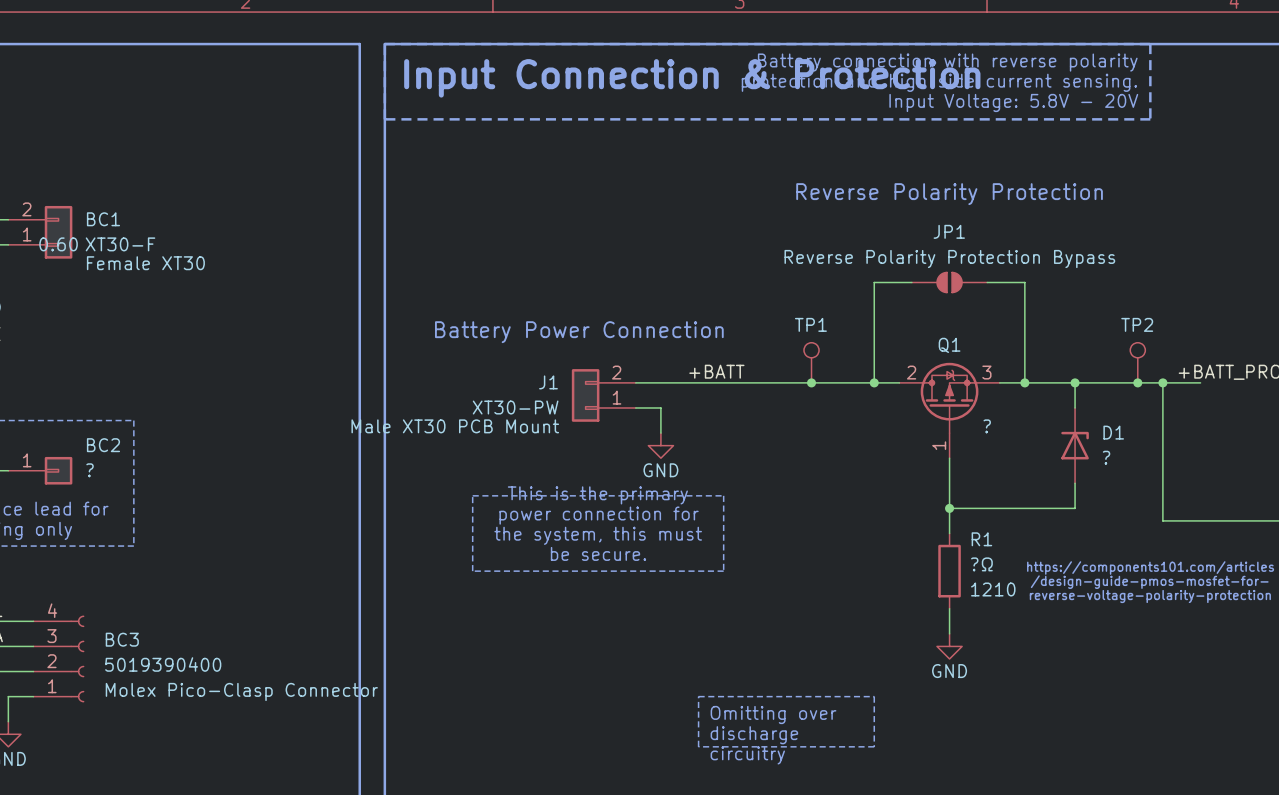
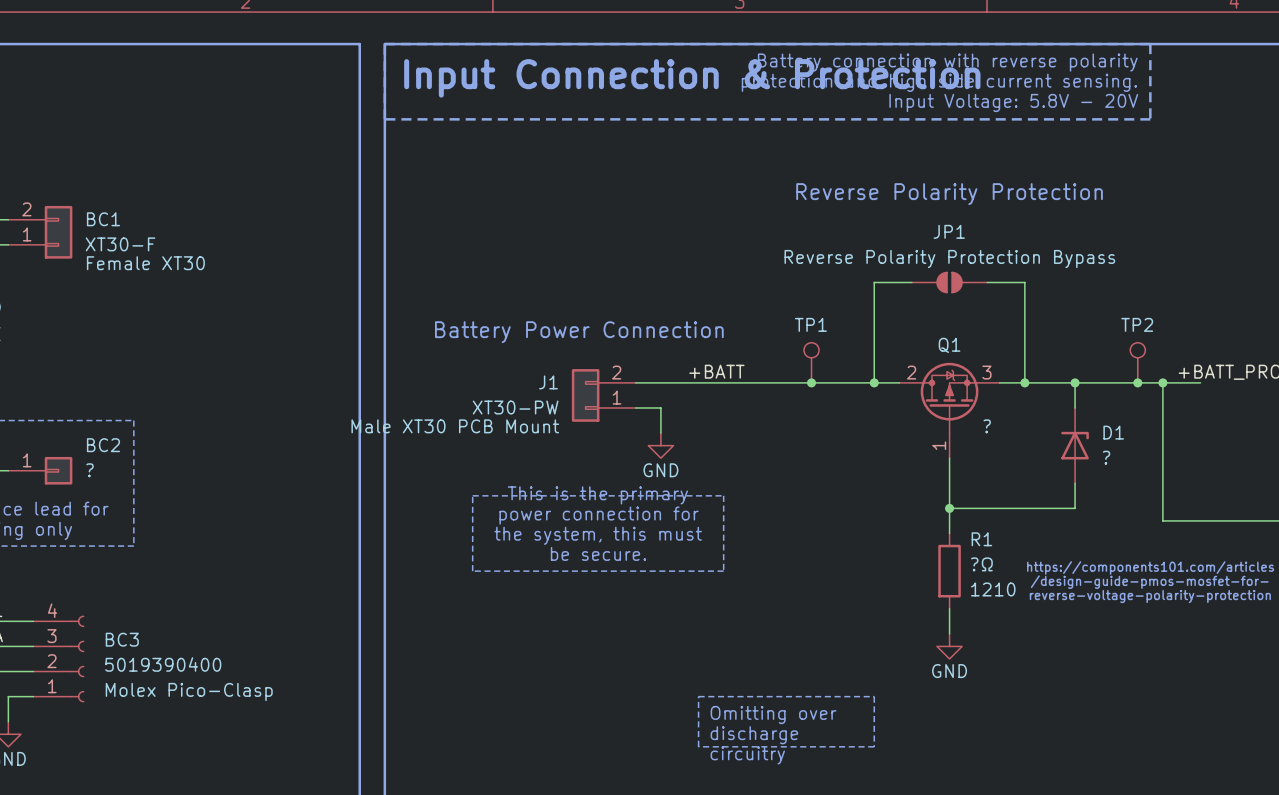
BC1 text: 0.60 (58, 244) -> none
BC3 text: Molex Pico-Clasp Connector (241, 691) -> Molex Pico-Clasp (189, 691)

